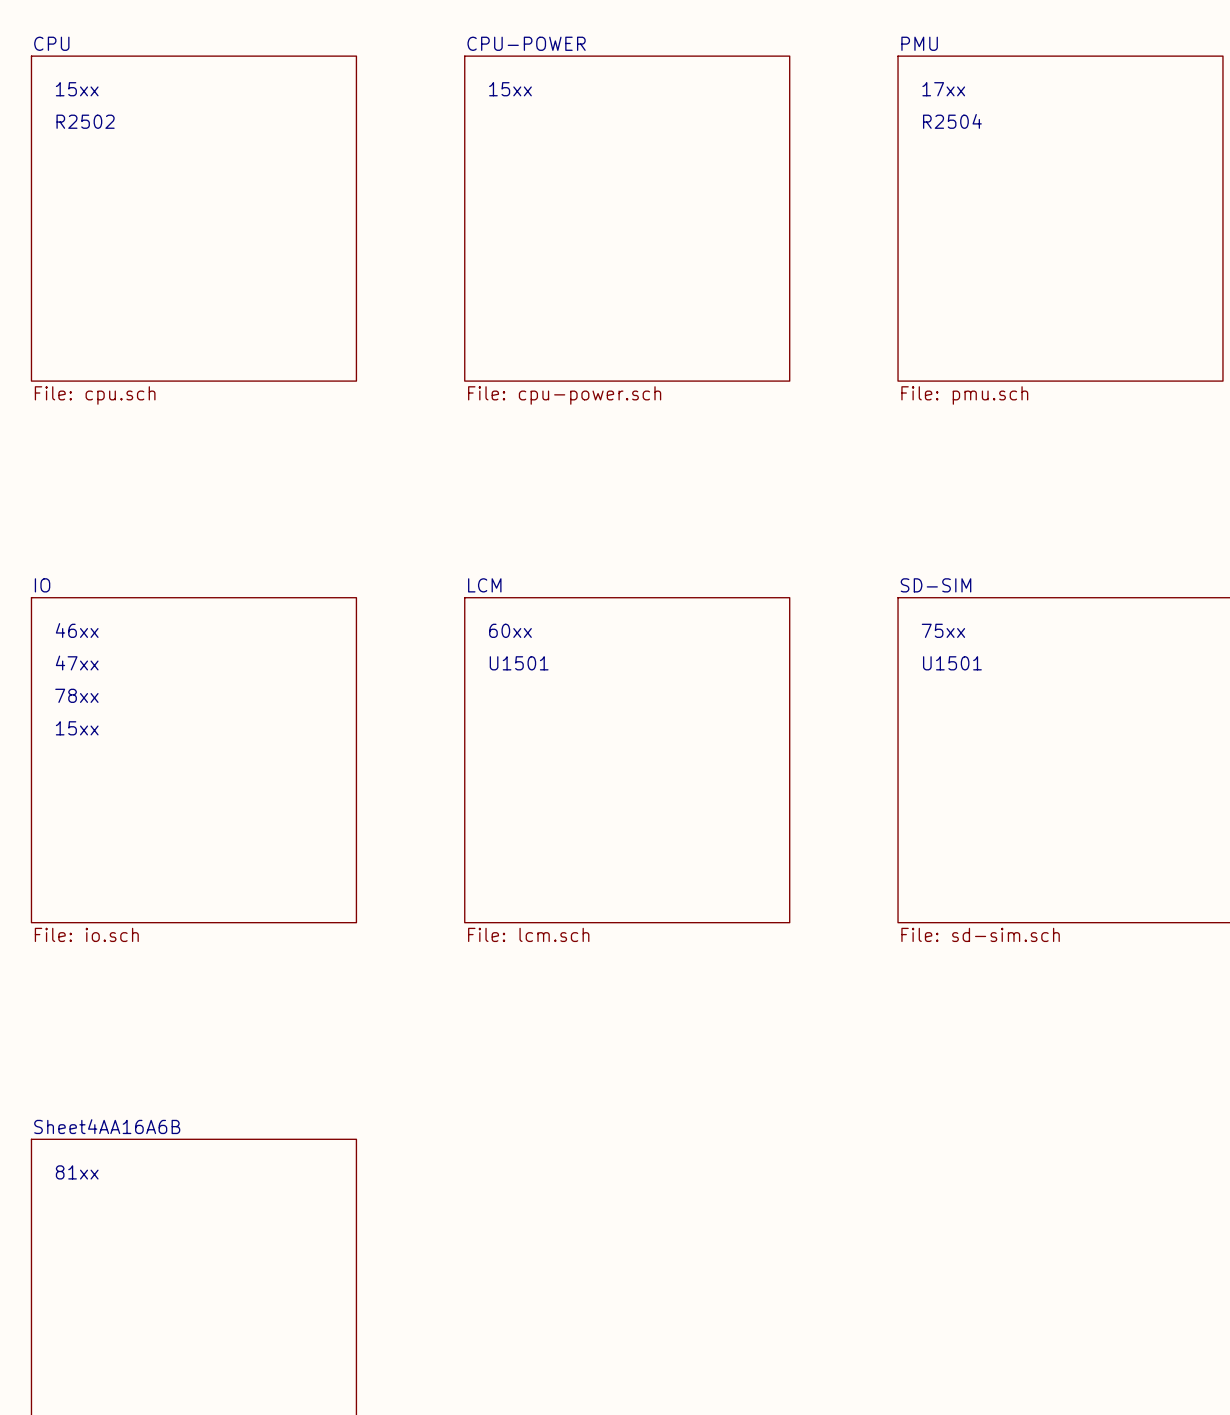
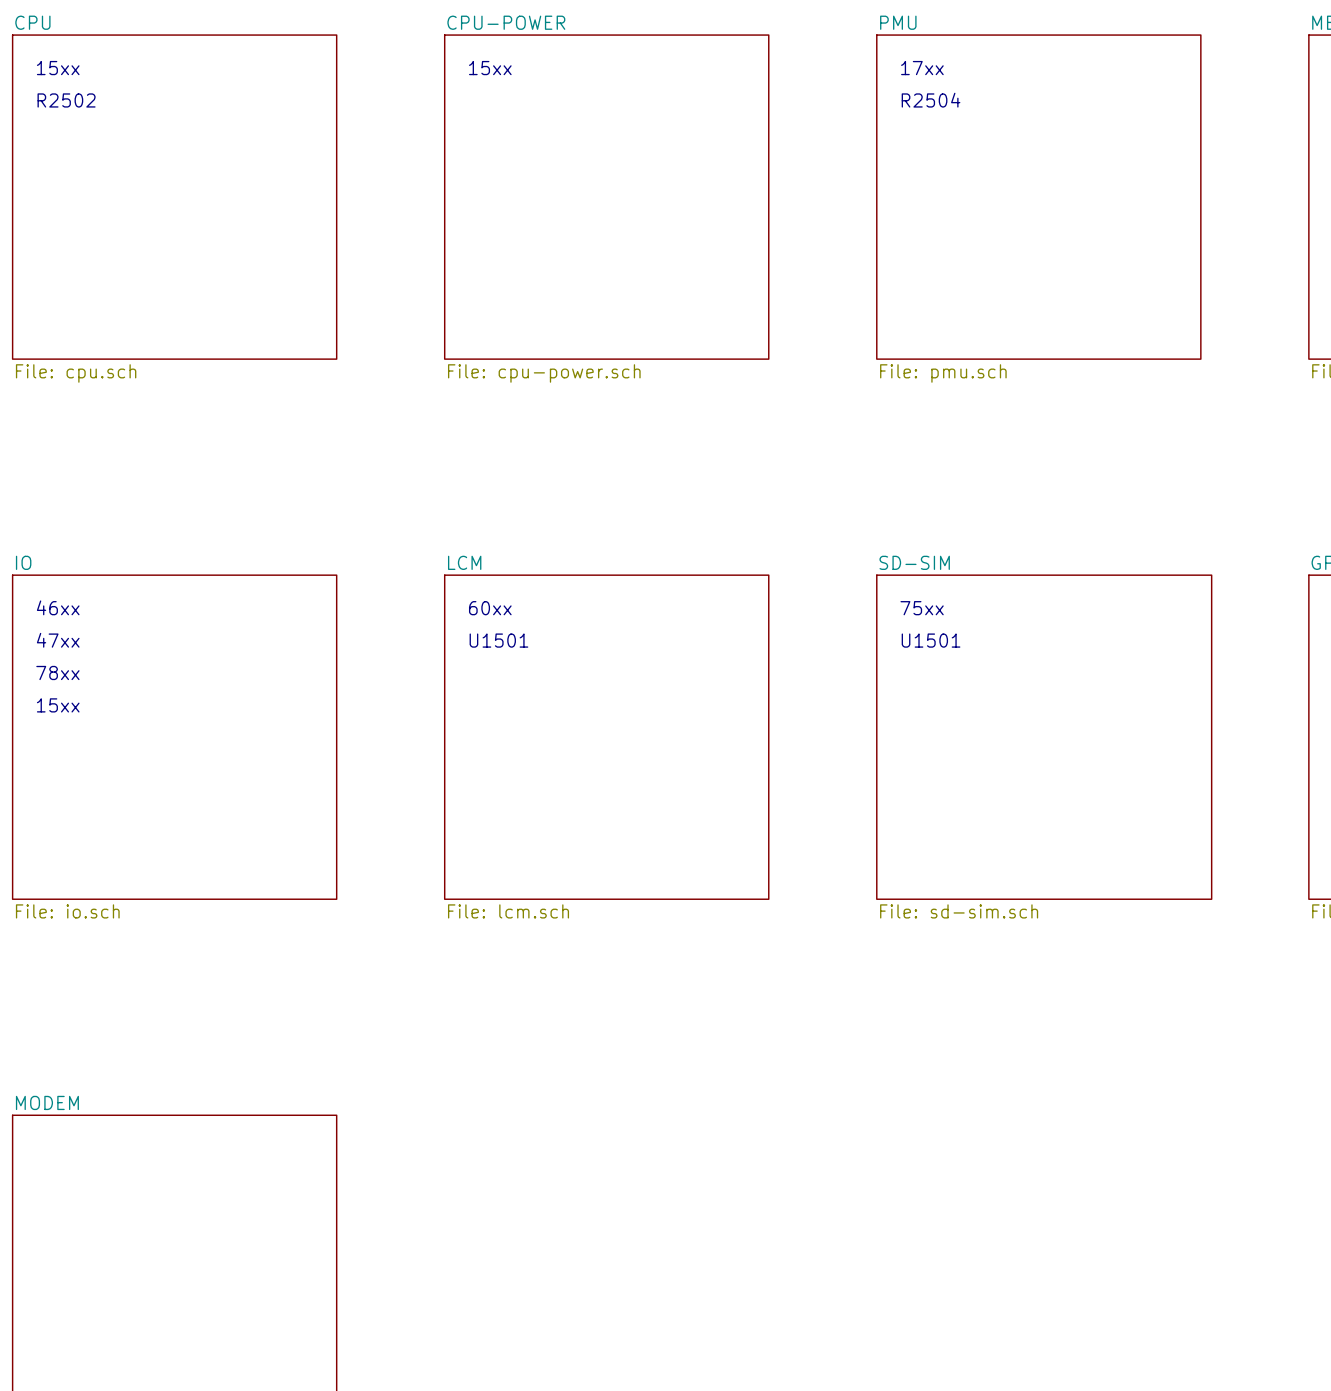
sheet Sheet4AA16A6B name: Sheet4AA16A6B (107, 1126) -> MODEM (47, 1102)
text: 81xx (77, 1172) -> none

